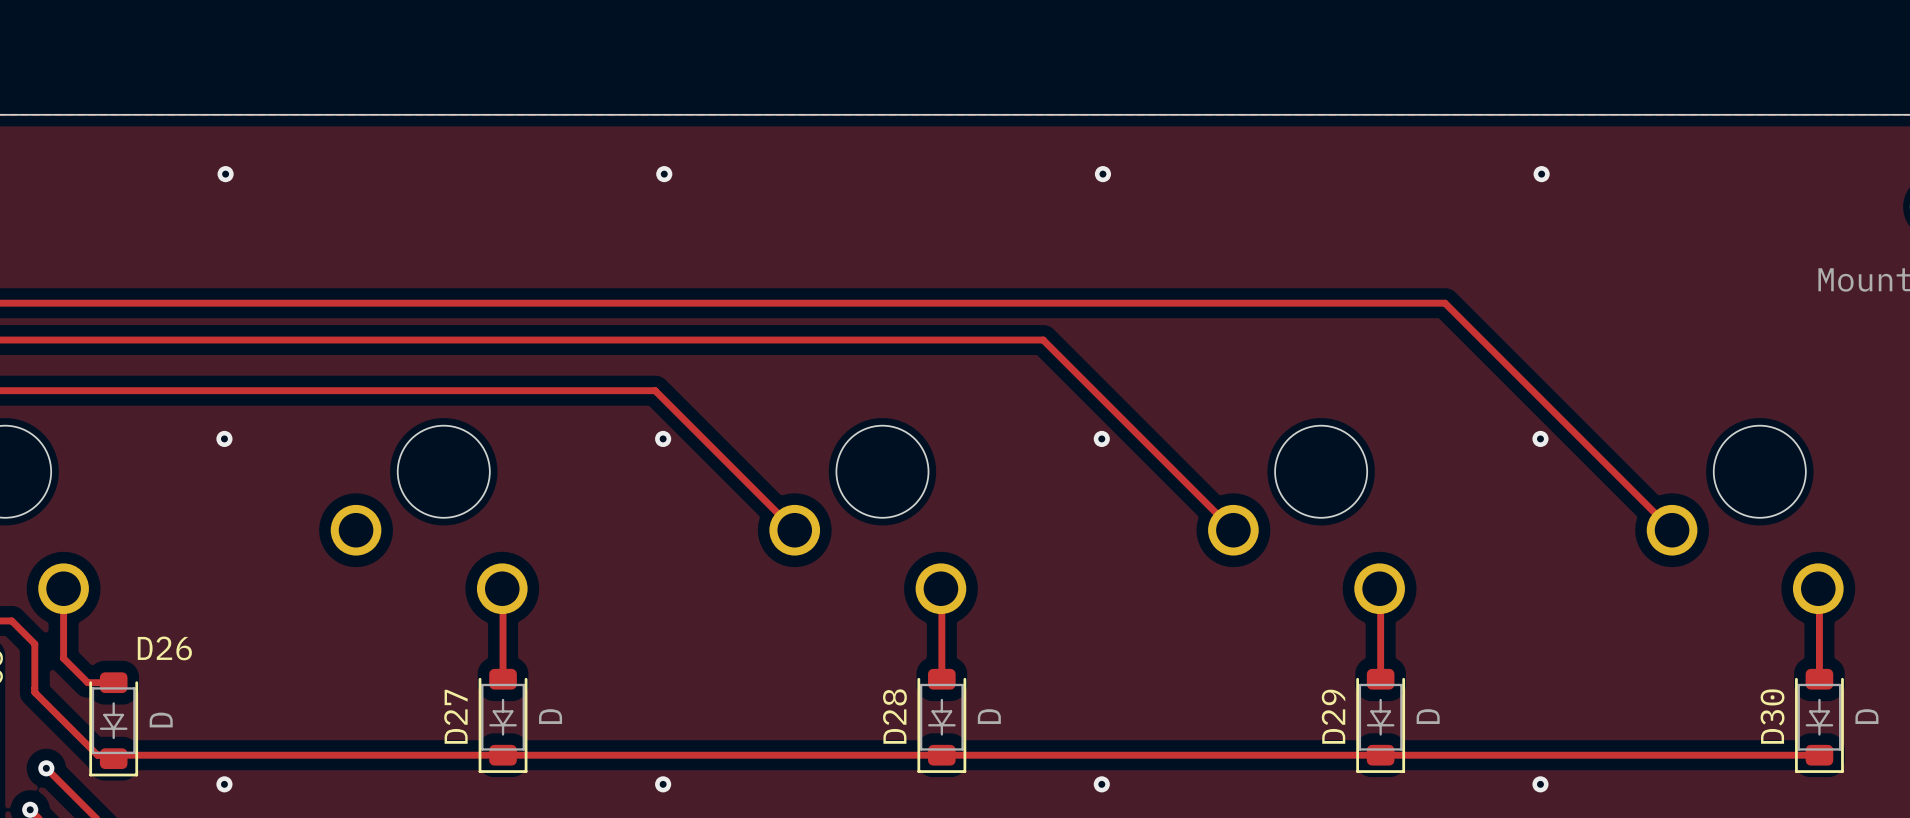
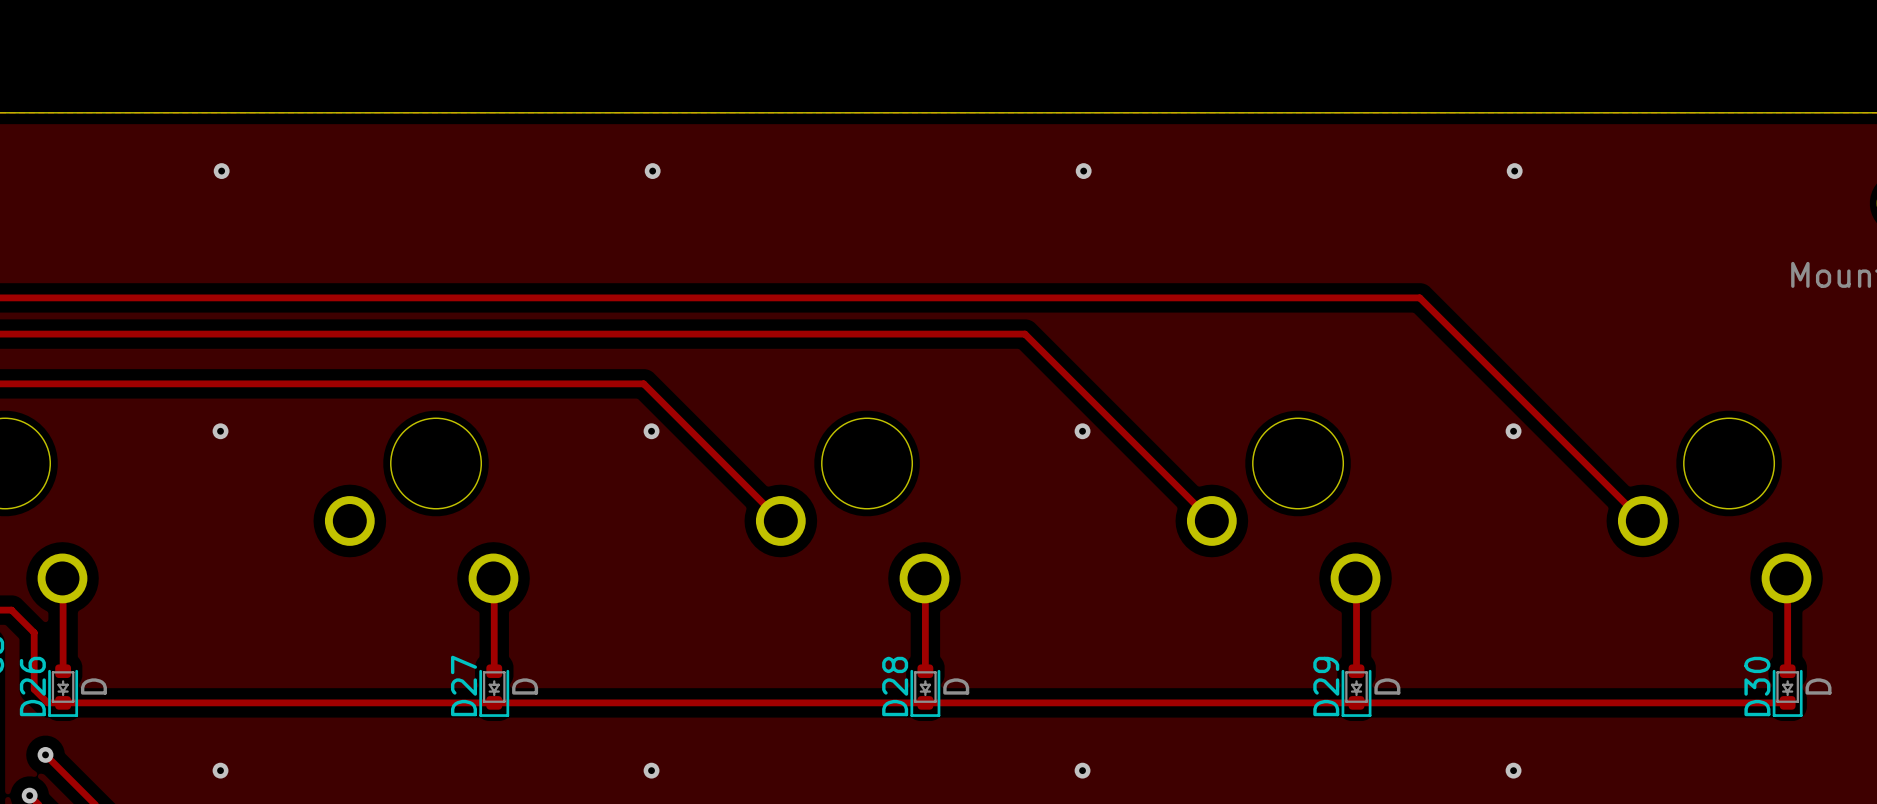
track: (63, 588) (63, 658) (87, 682) (113, 682) -> (63, 579) (63, 671)
D26 name position: D26 (164, 648) -> D26 (32, 686)
D27 footprint: [478, 668, 528, 773] -> [479, 664, 510, 717]
D28 footprint: [917, 668, 967, 773] -> [910, 664, 941, 717]
D29 footprint: [1356, 668, 1406, 773] -> [1341, 664, 1372, 717]
D30 footprint: [1795, 668, 1844, 773] -> [1772, 664, 1803, 717]
D26 footprint: [89, 672, 139, 777] -> [48, 664, 79, 717]
track: (34, 692) (97, 755) (1819, 755) -> (34, 680) (34, 689) (47, 702) (1787, 702)

